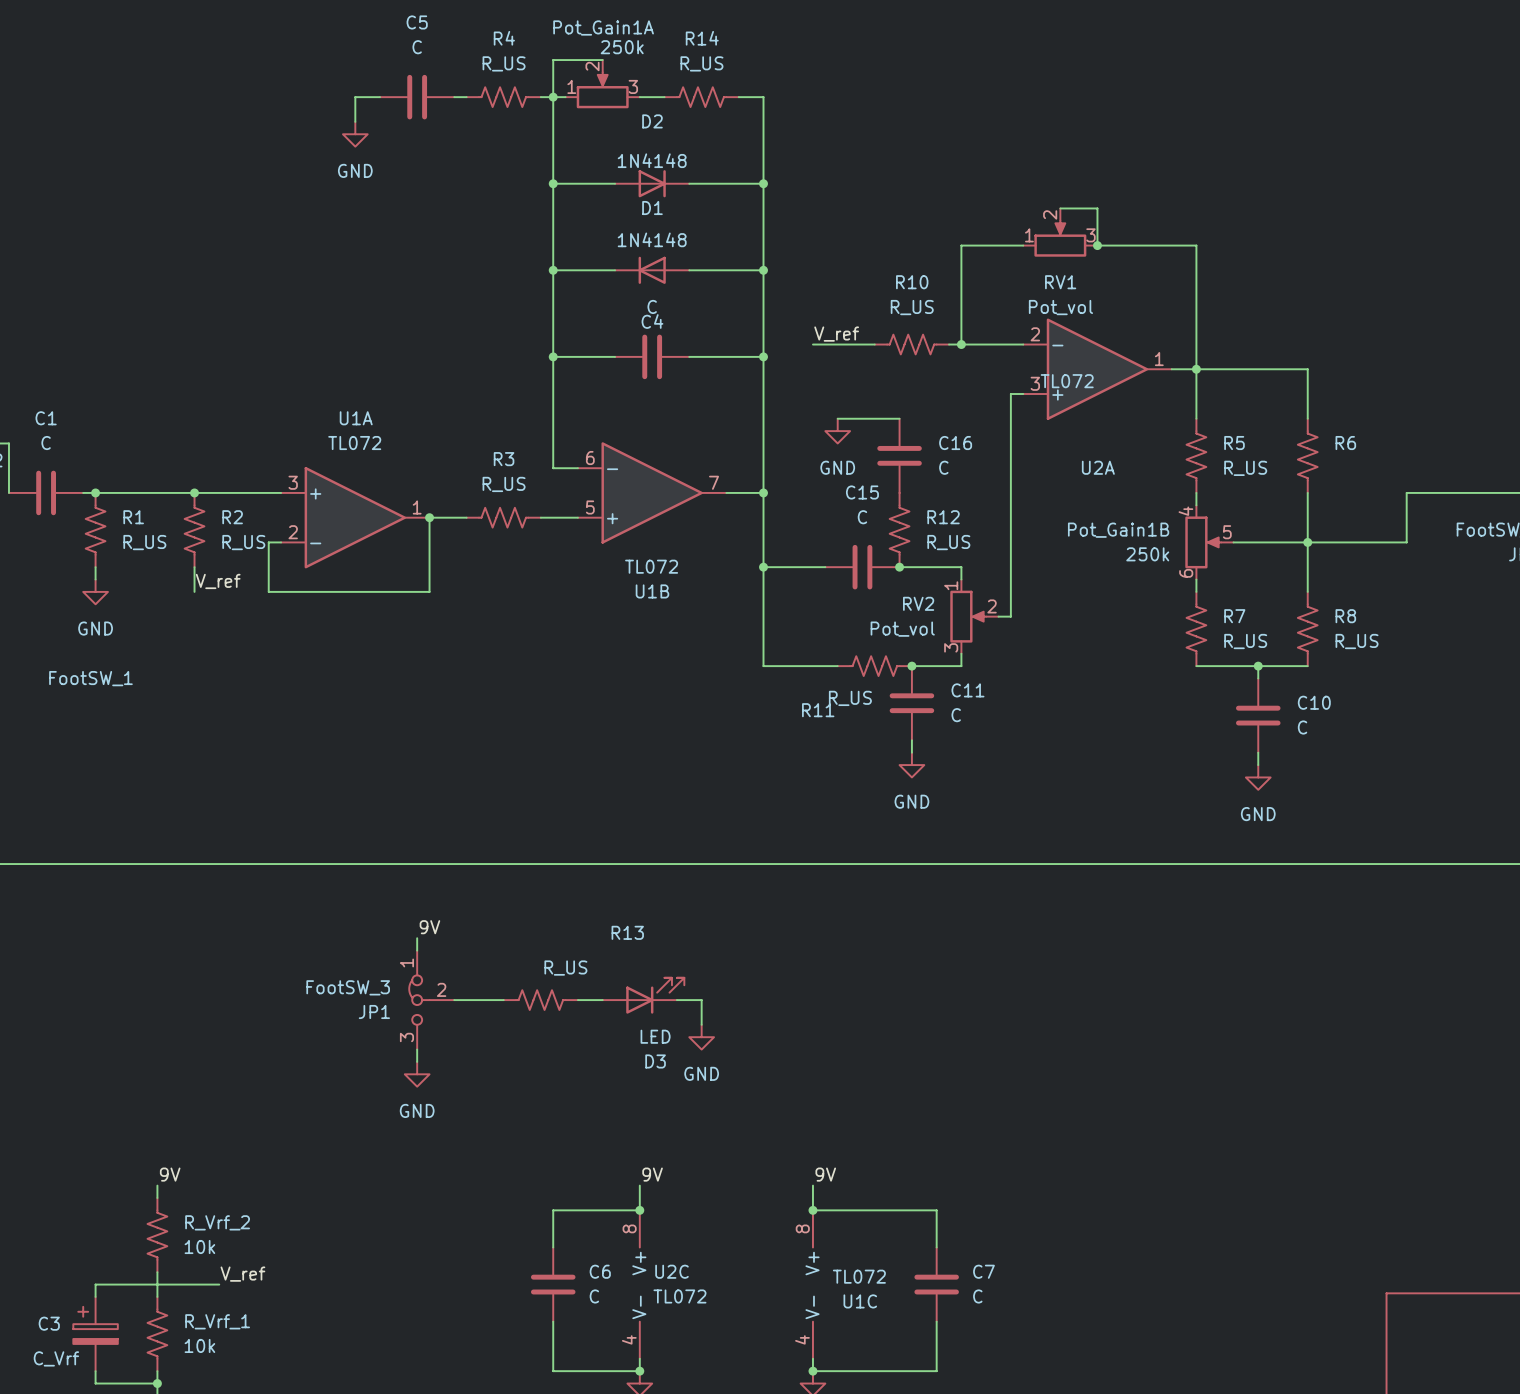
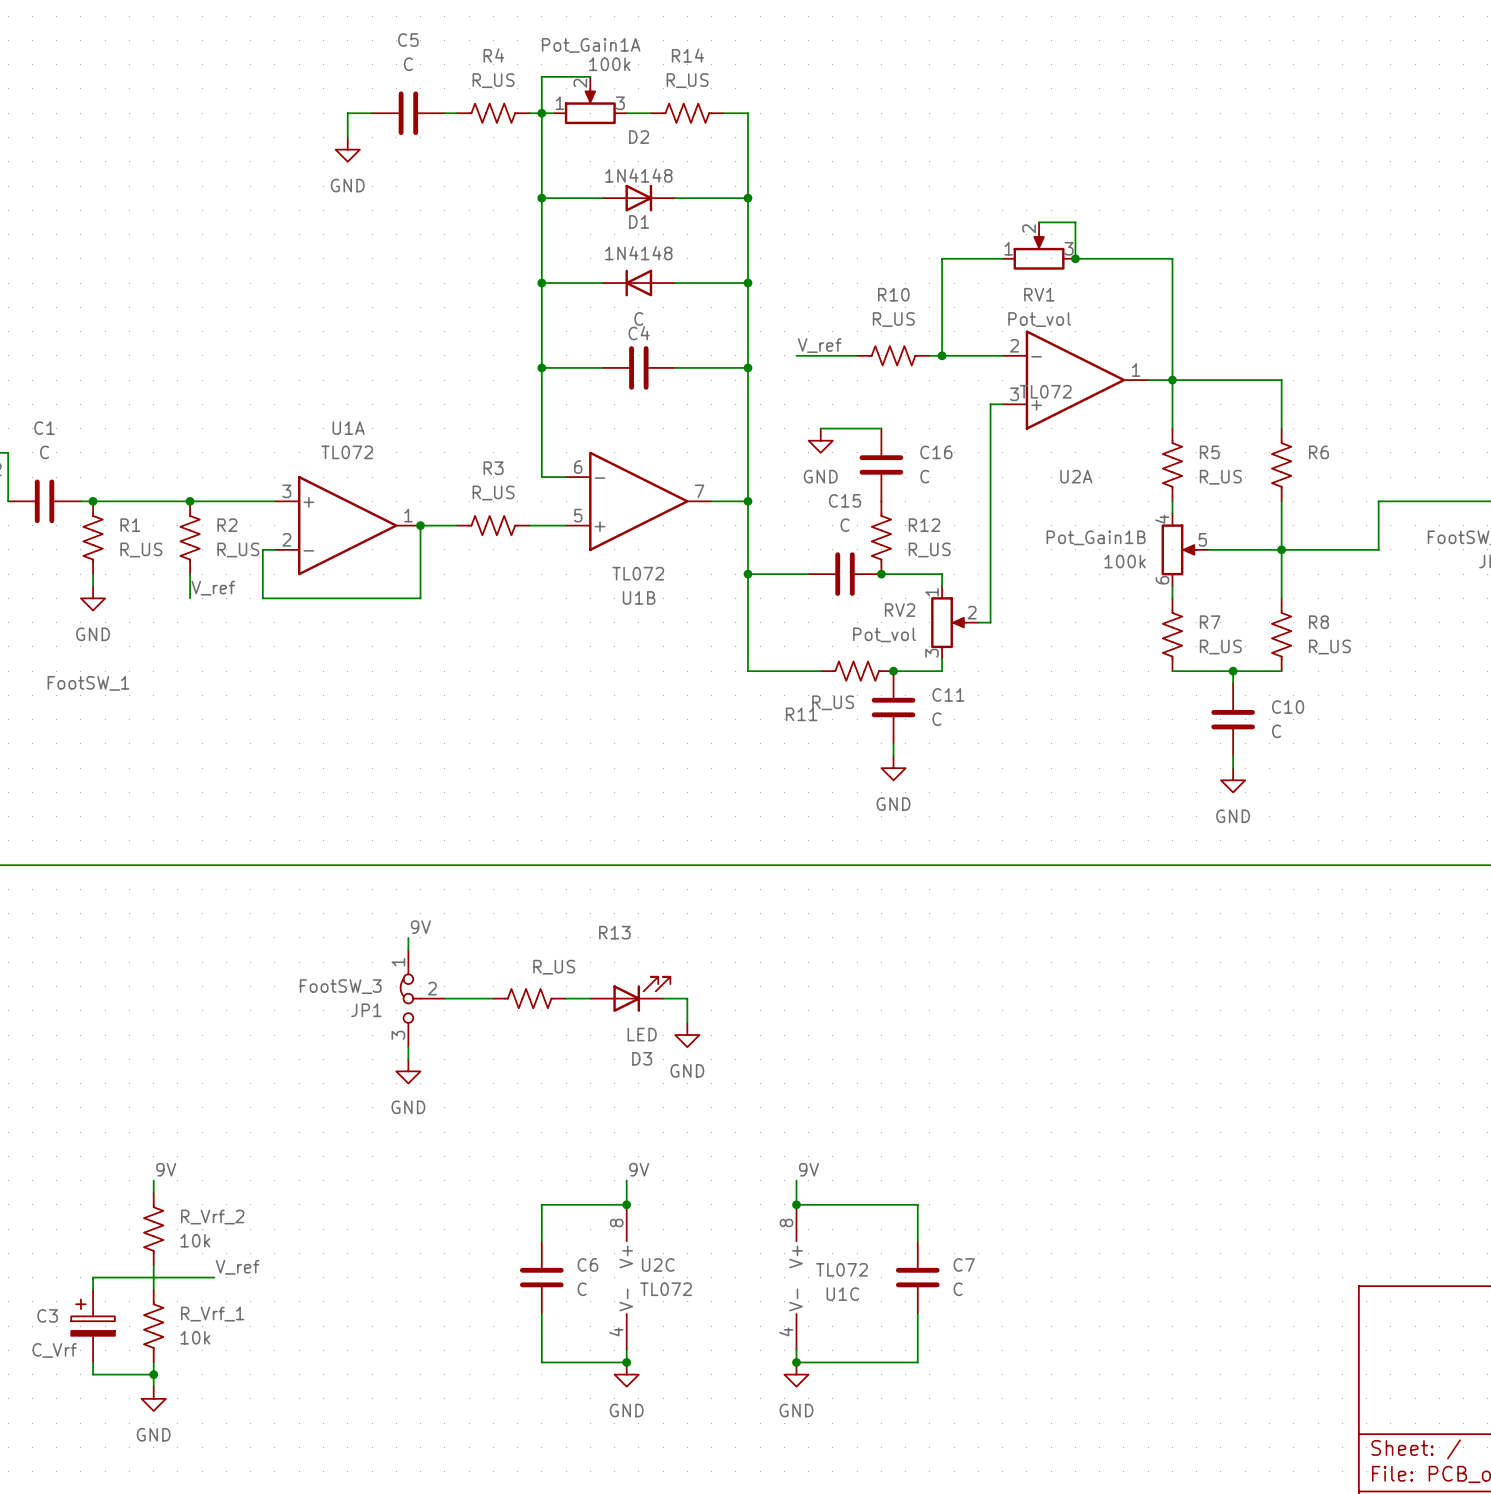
Pot_Gain1A value: 250k (622, 47) -> 100k (609, 64)
Pot_Gain1B value: 250k (1147, 554) -> 100k (1125, 561)

